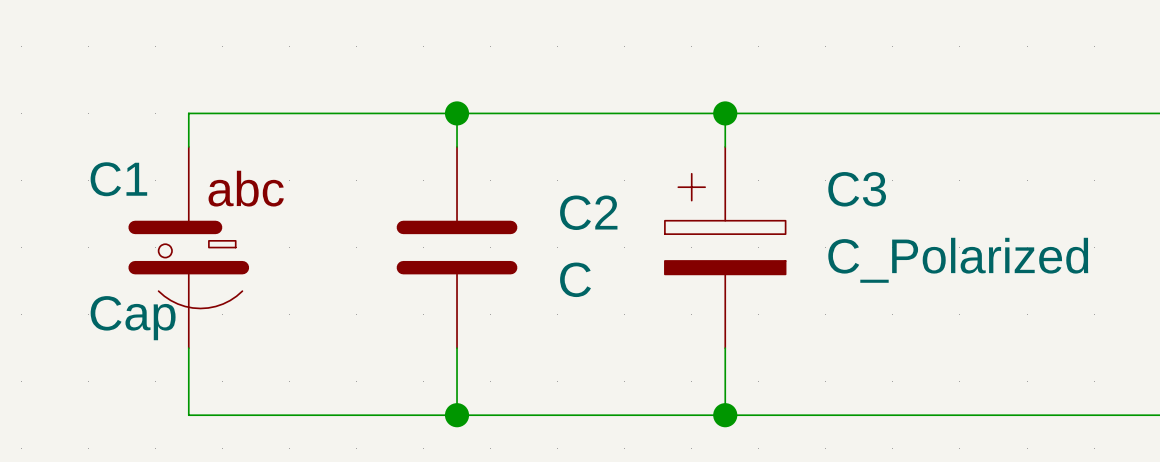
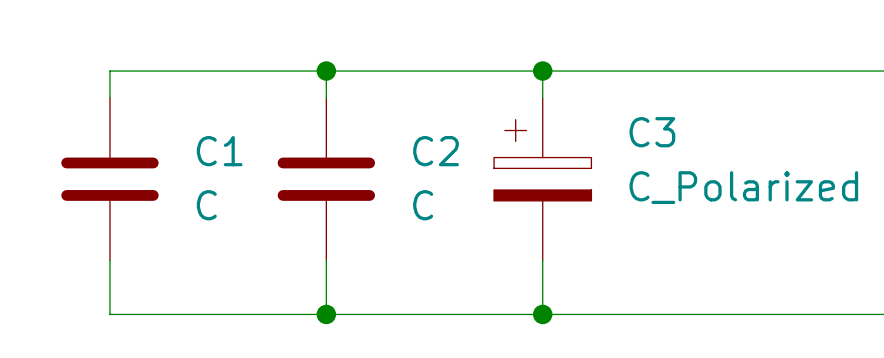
C1 symbol: [128, 146, 250, 349] -> [61, 98, 159, 261]
C1 name position: C1 (118, 179) -> C1 (219, 151)
C1 value: Cap (133, 318) -> C (206, 205)

